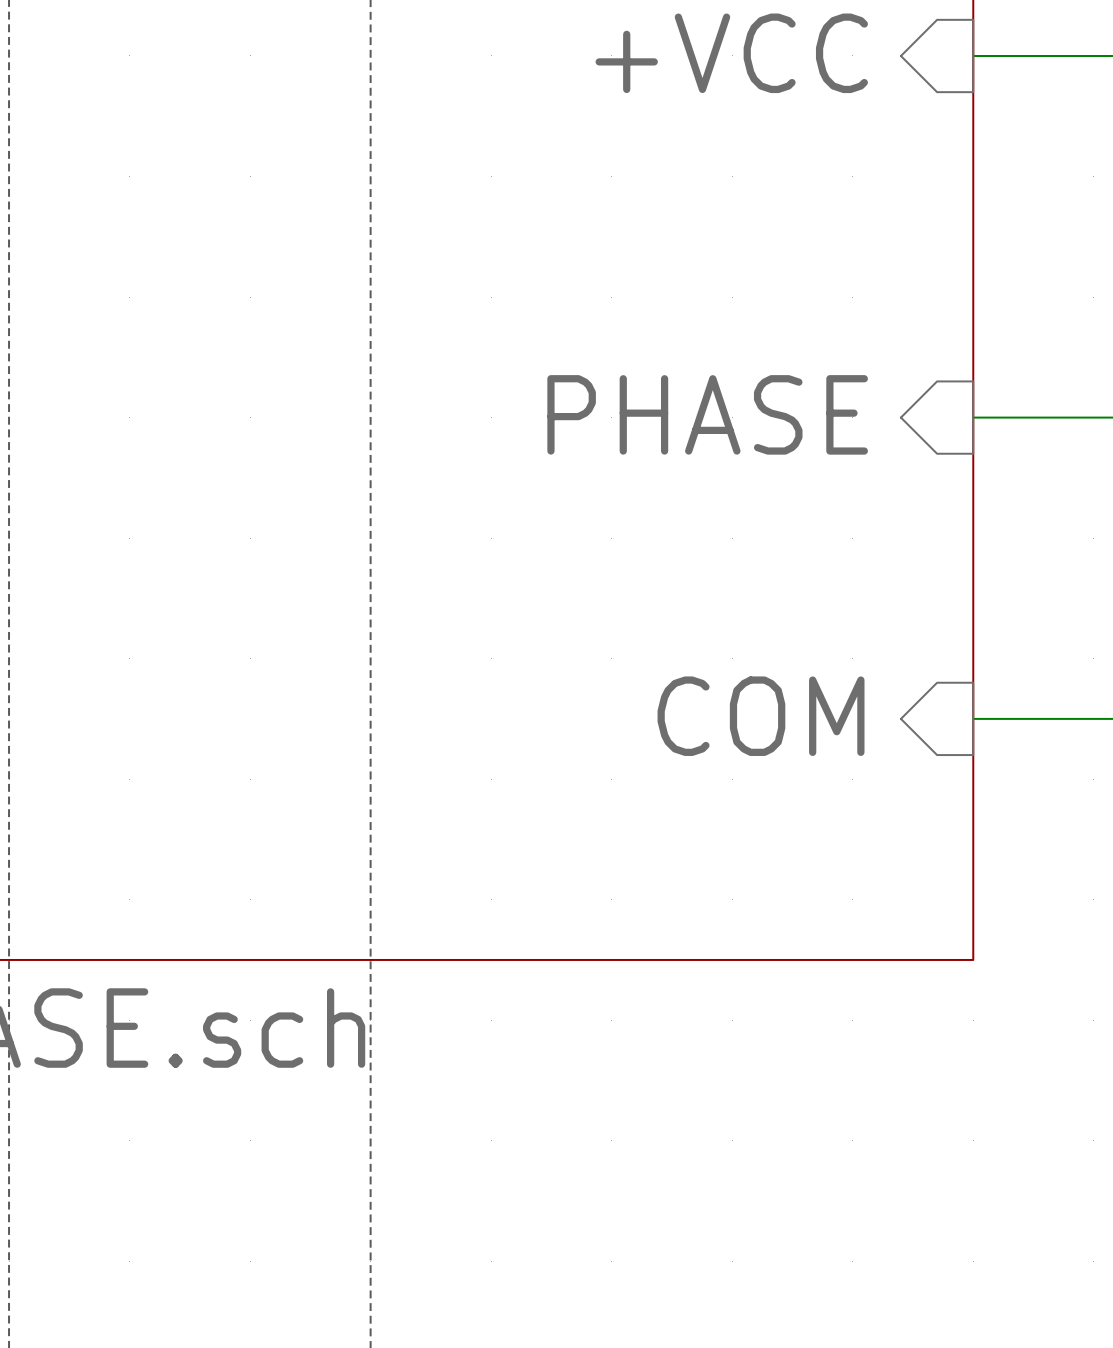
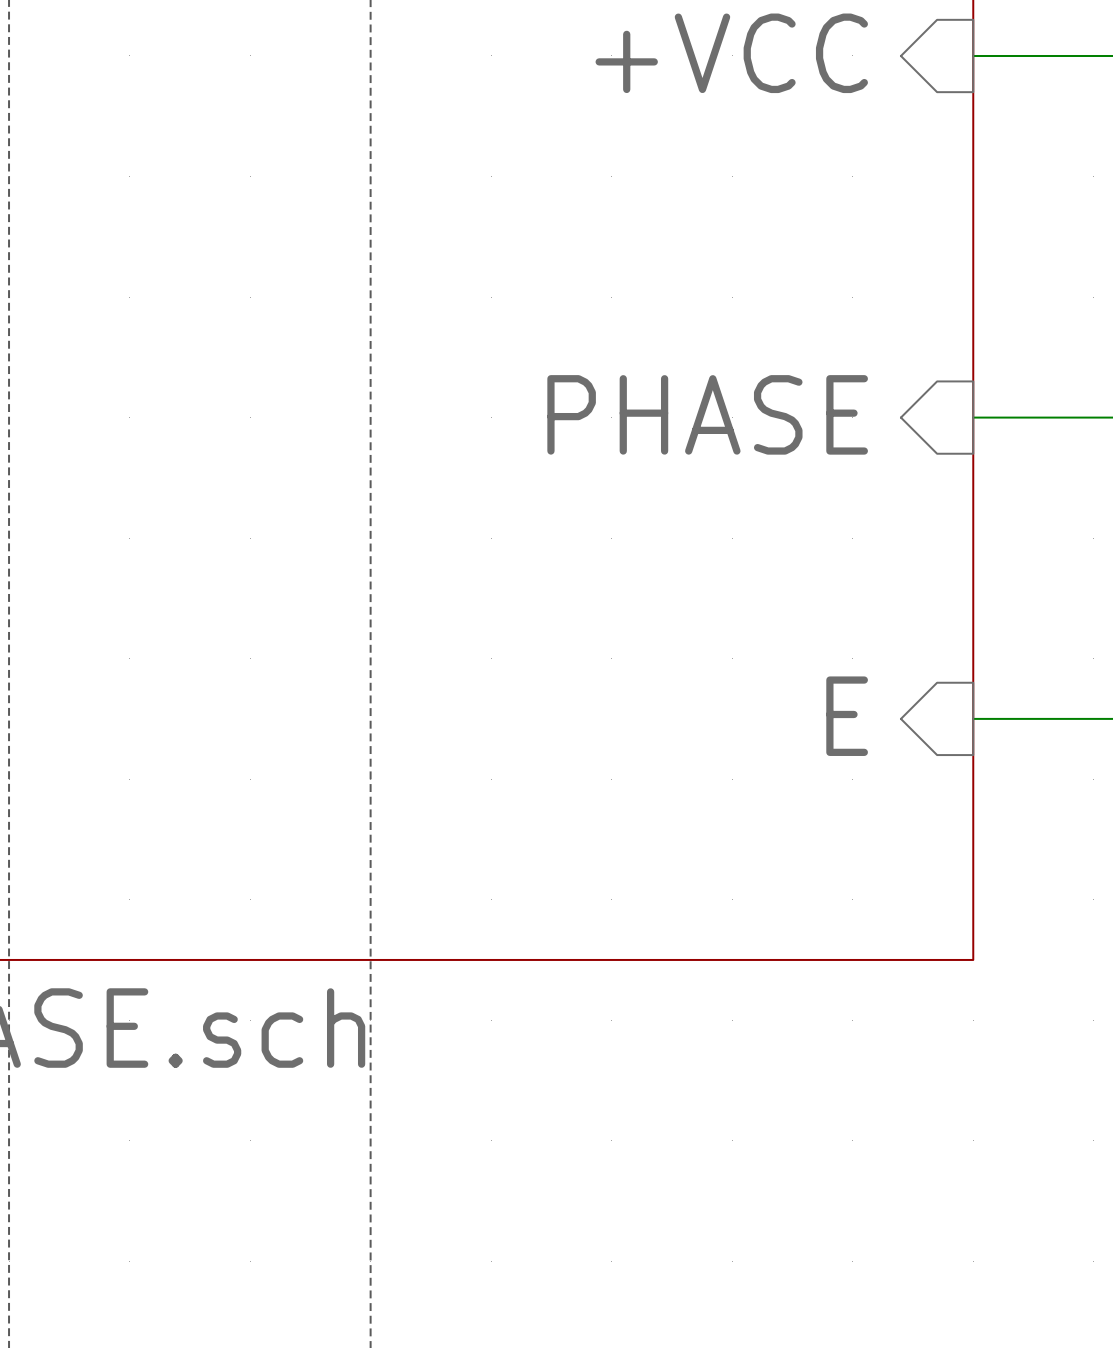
sheet pin: COM (761, 716) -> E (847, 716)

